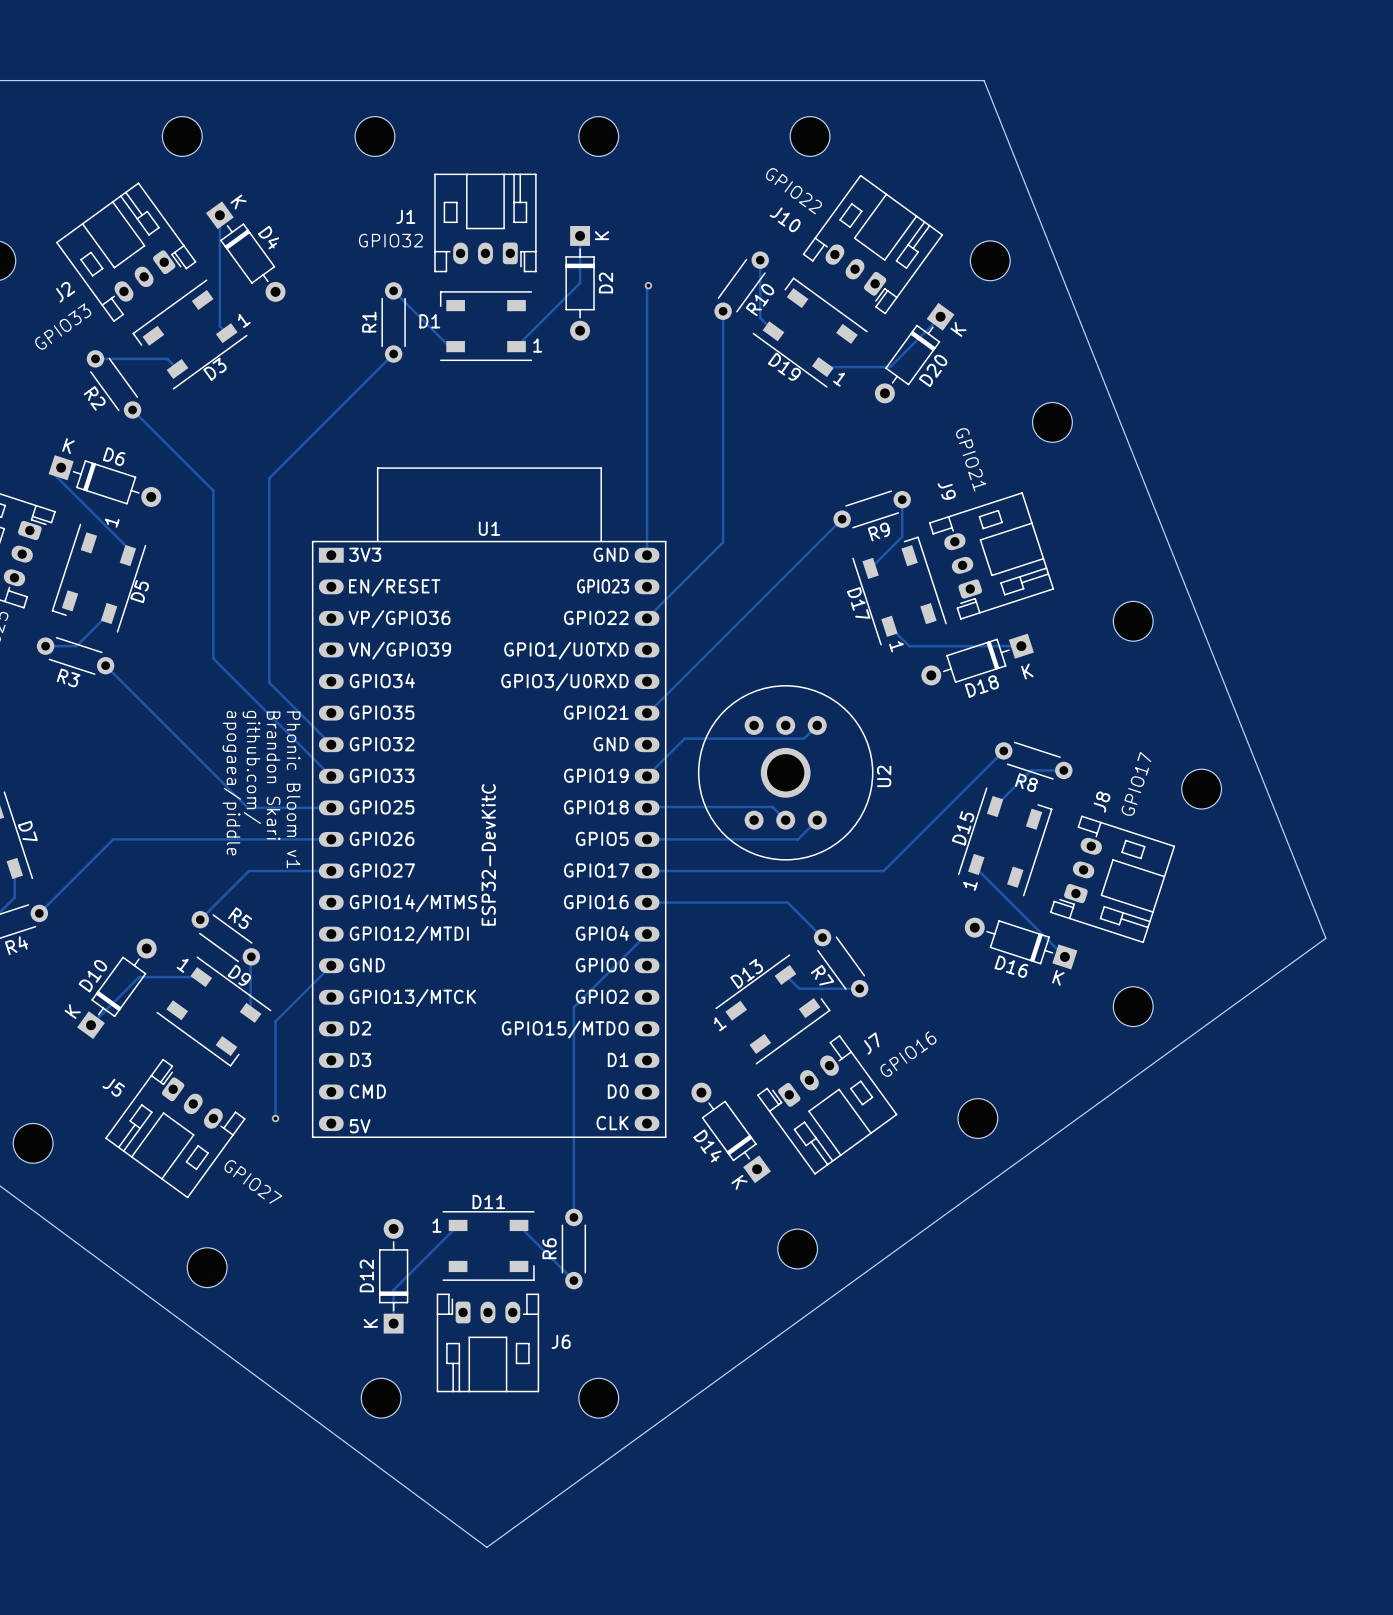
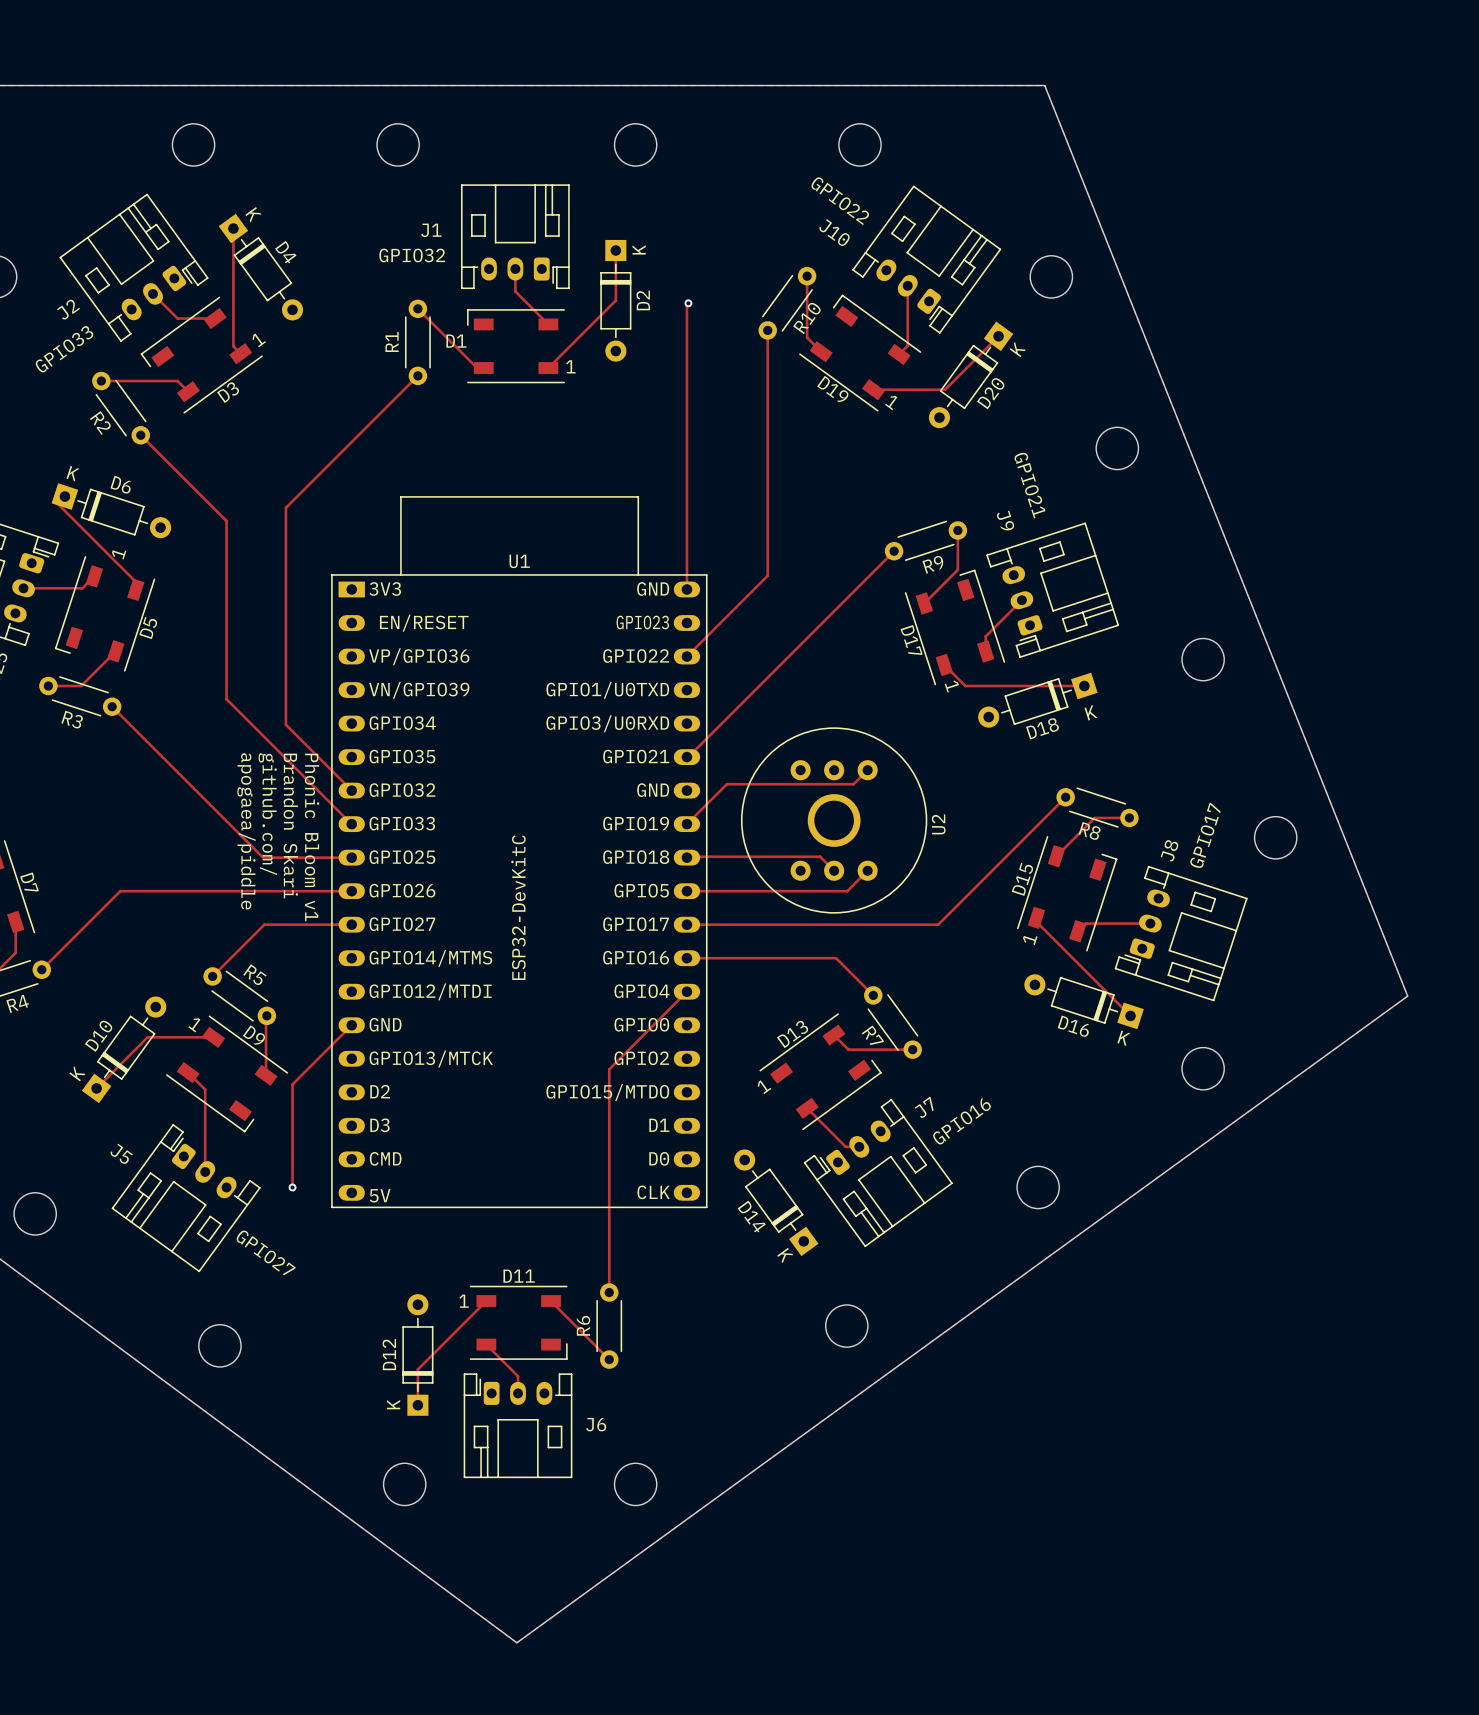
track: none -> (515, 269) (515, 291) (548, 324)
track: none -> (907, 285) (907, 345) (899, 354)
track: none -> (153, 293) (177, 318) (215, 318)
track: none -> (94, 576) (82, 588) (23, 588)
track: none -> (1021, 600) (985, 636) (985, 651)
track: none -> (1150, 923) (1085, 923) (1077, 931)
track: none -> (188, 1072) (205, 1089) (205, 1171)
track: none -> (807, 1108) (845, 1146) (859, 1146)
track: none -> (486, 1344) (518, 1376) (518, 1393)

